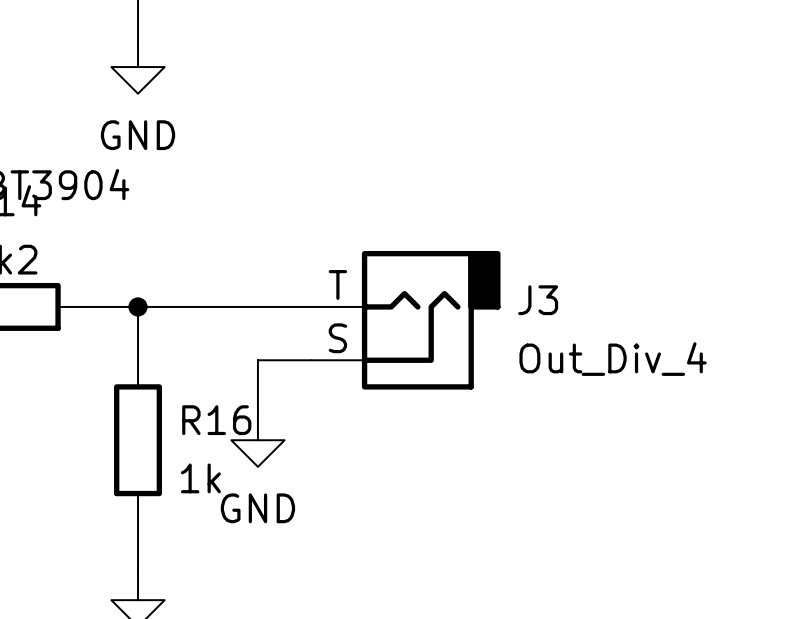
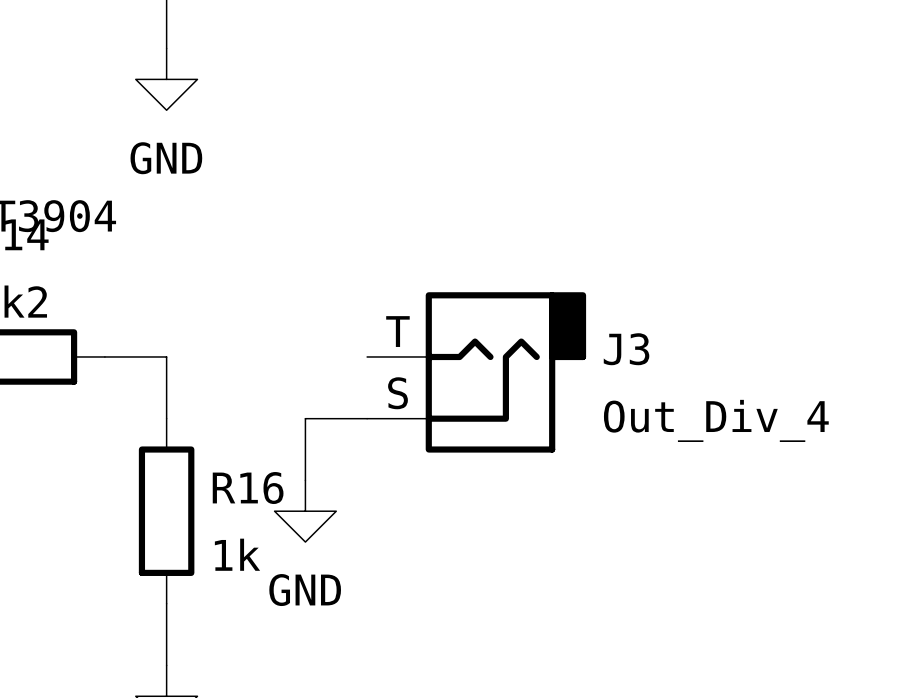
wire: (138, 306) (311, 306) -> none
junction: (138, 306) -> none

